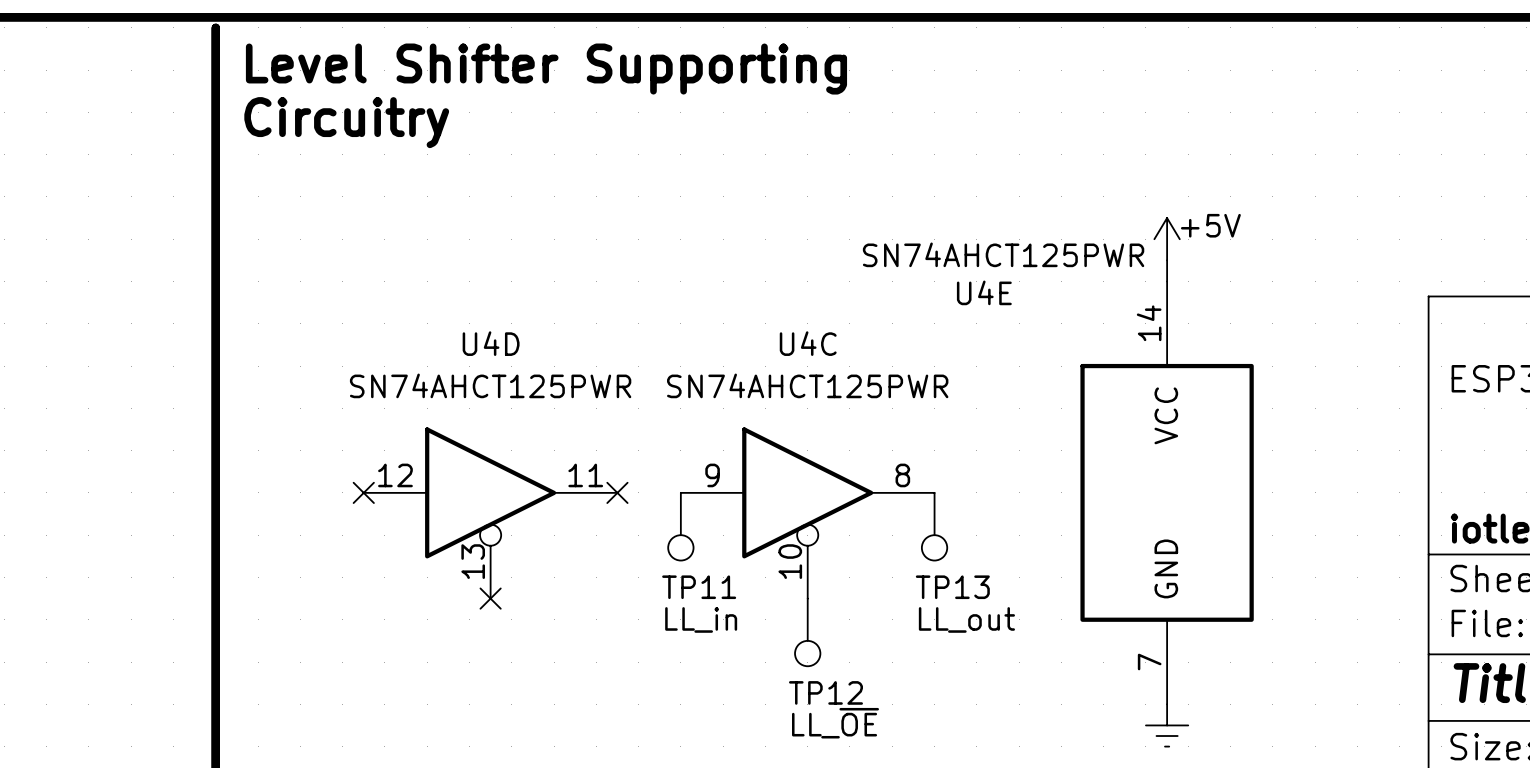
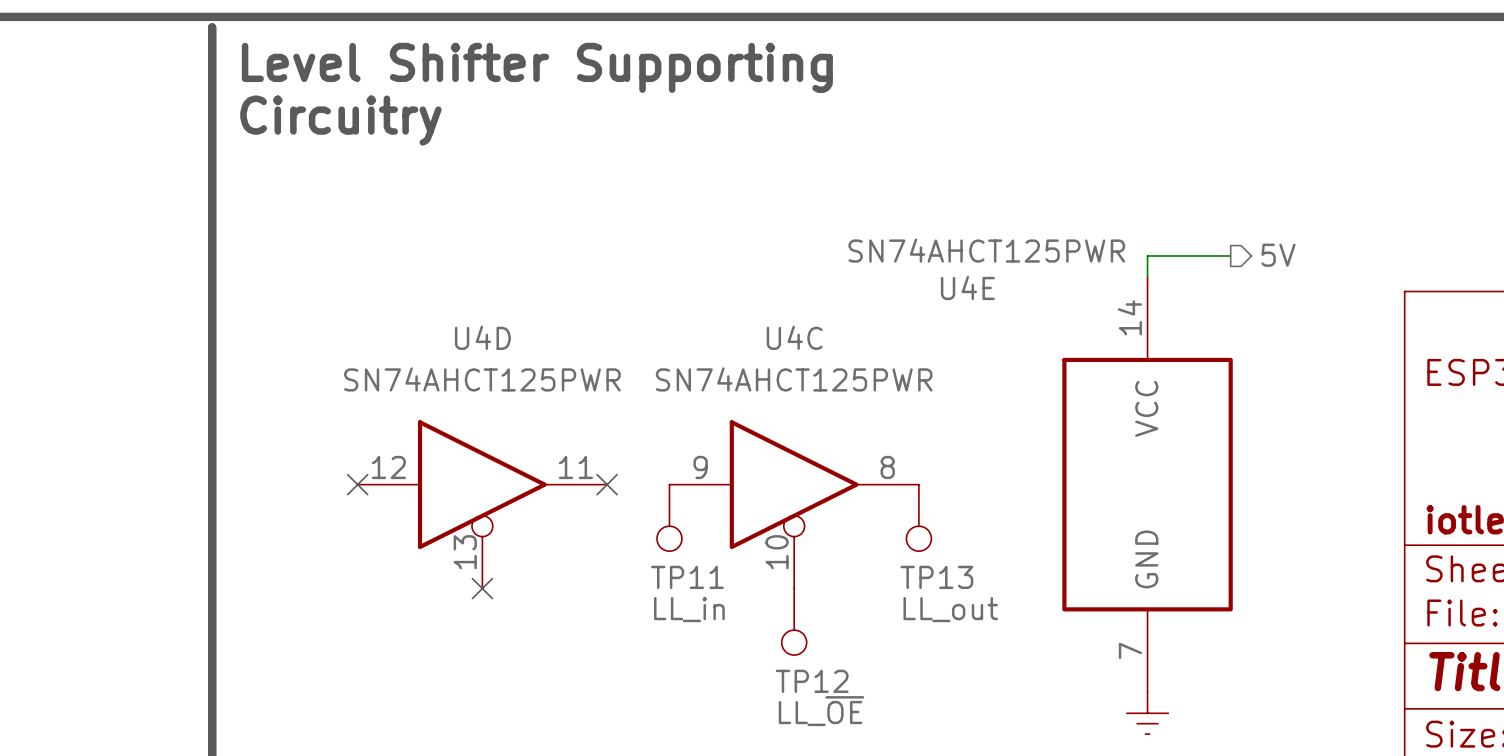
power symbol: +5V (1167, 239) -> none
hierarchical label: none -> 5V (1278, 255)
wire: none -> (1147, 255) (1230, 255)

